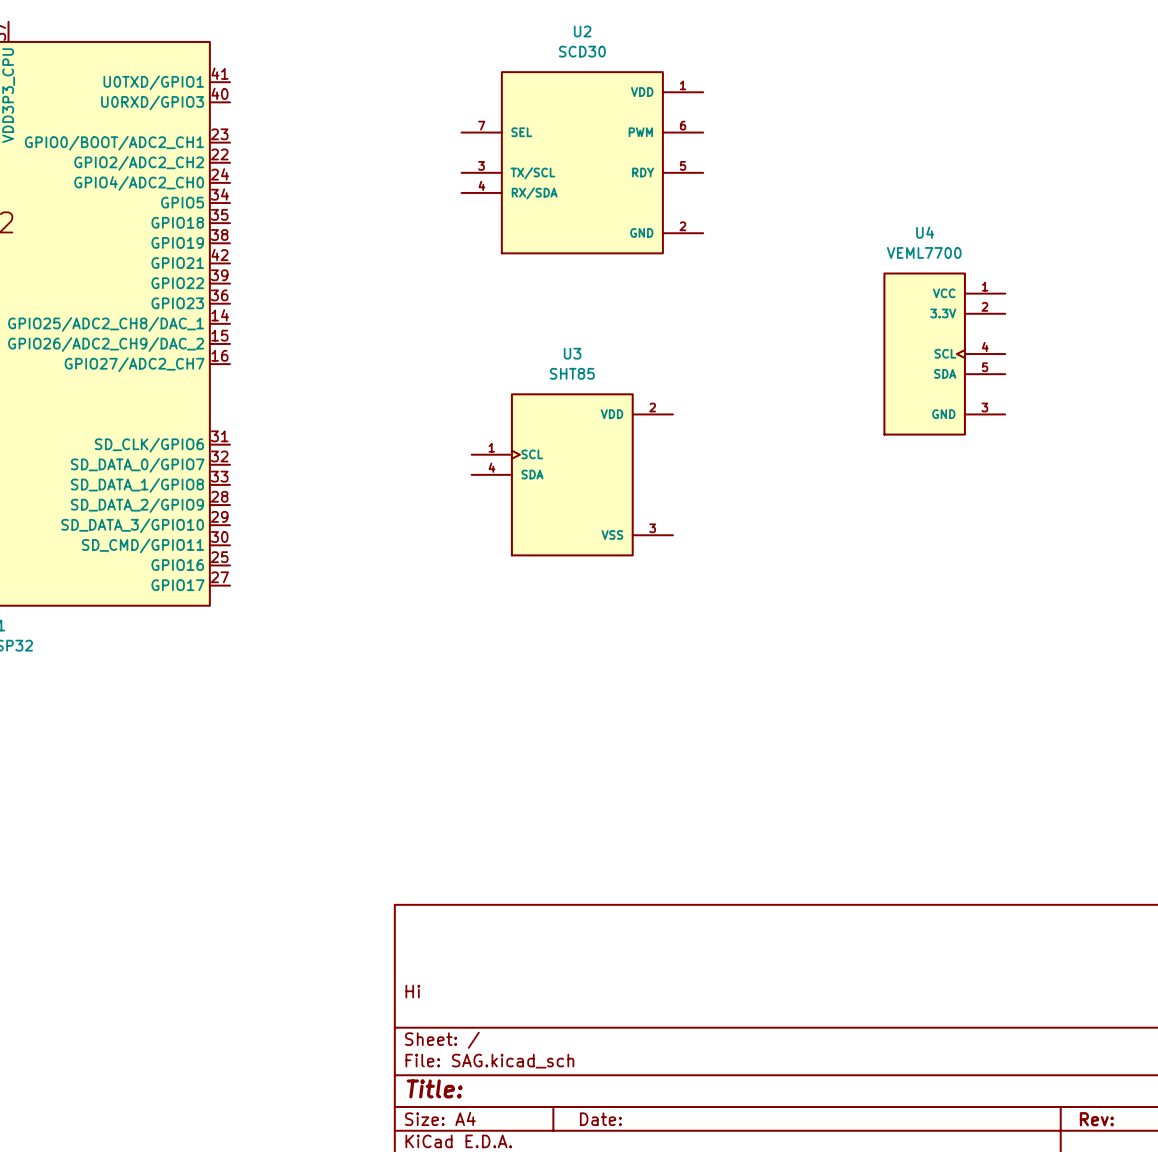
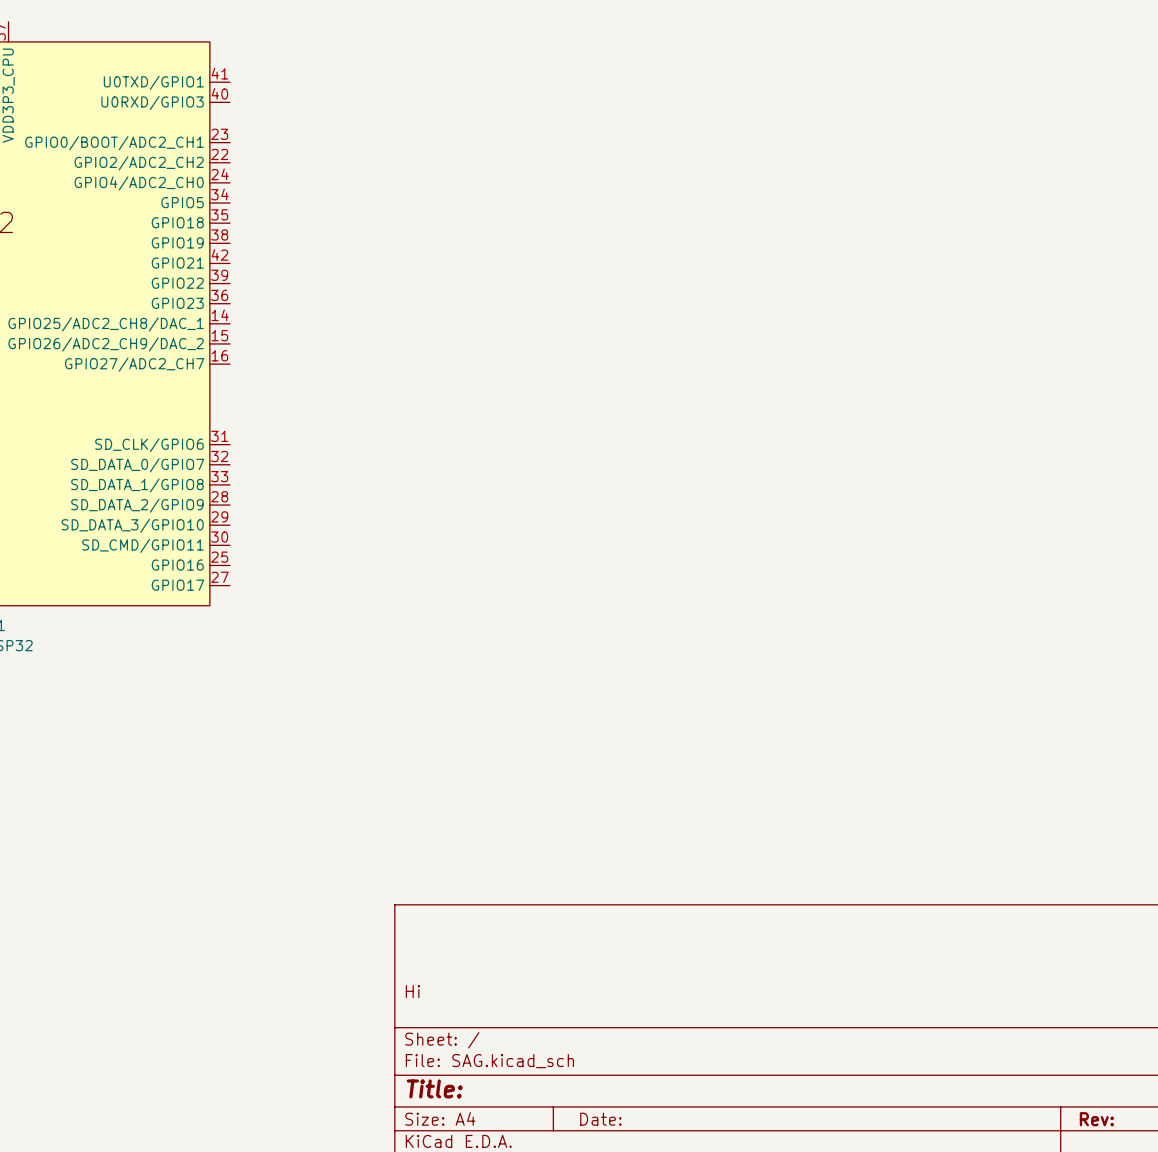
U2: SCD30 (582, 162) -> none
U4: VEML7700 (944, 354) -> none
U3: SHT85 (572, 474) -> none

